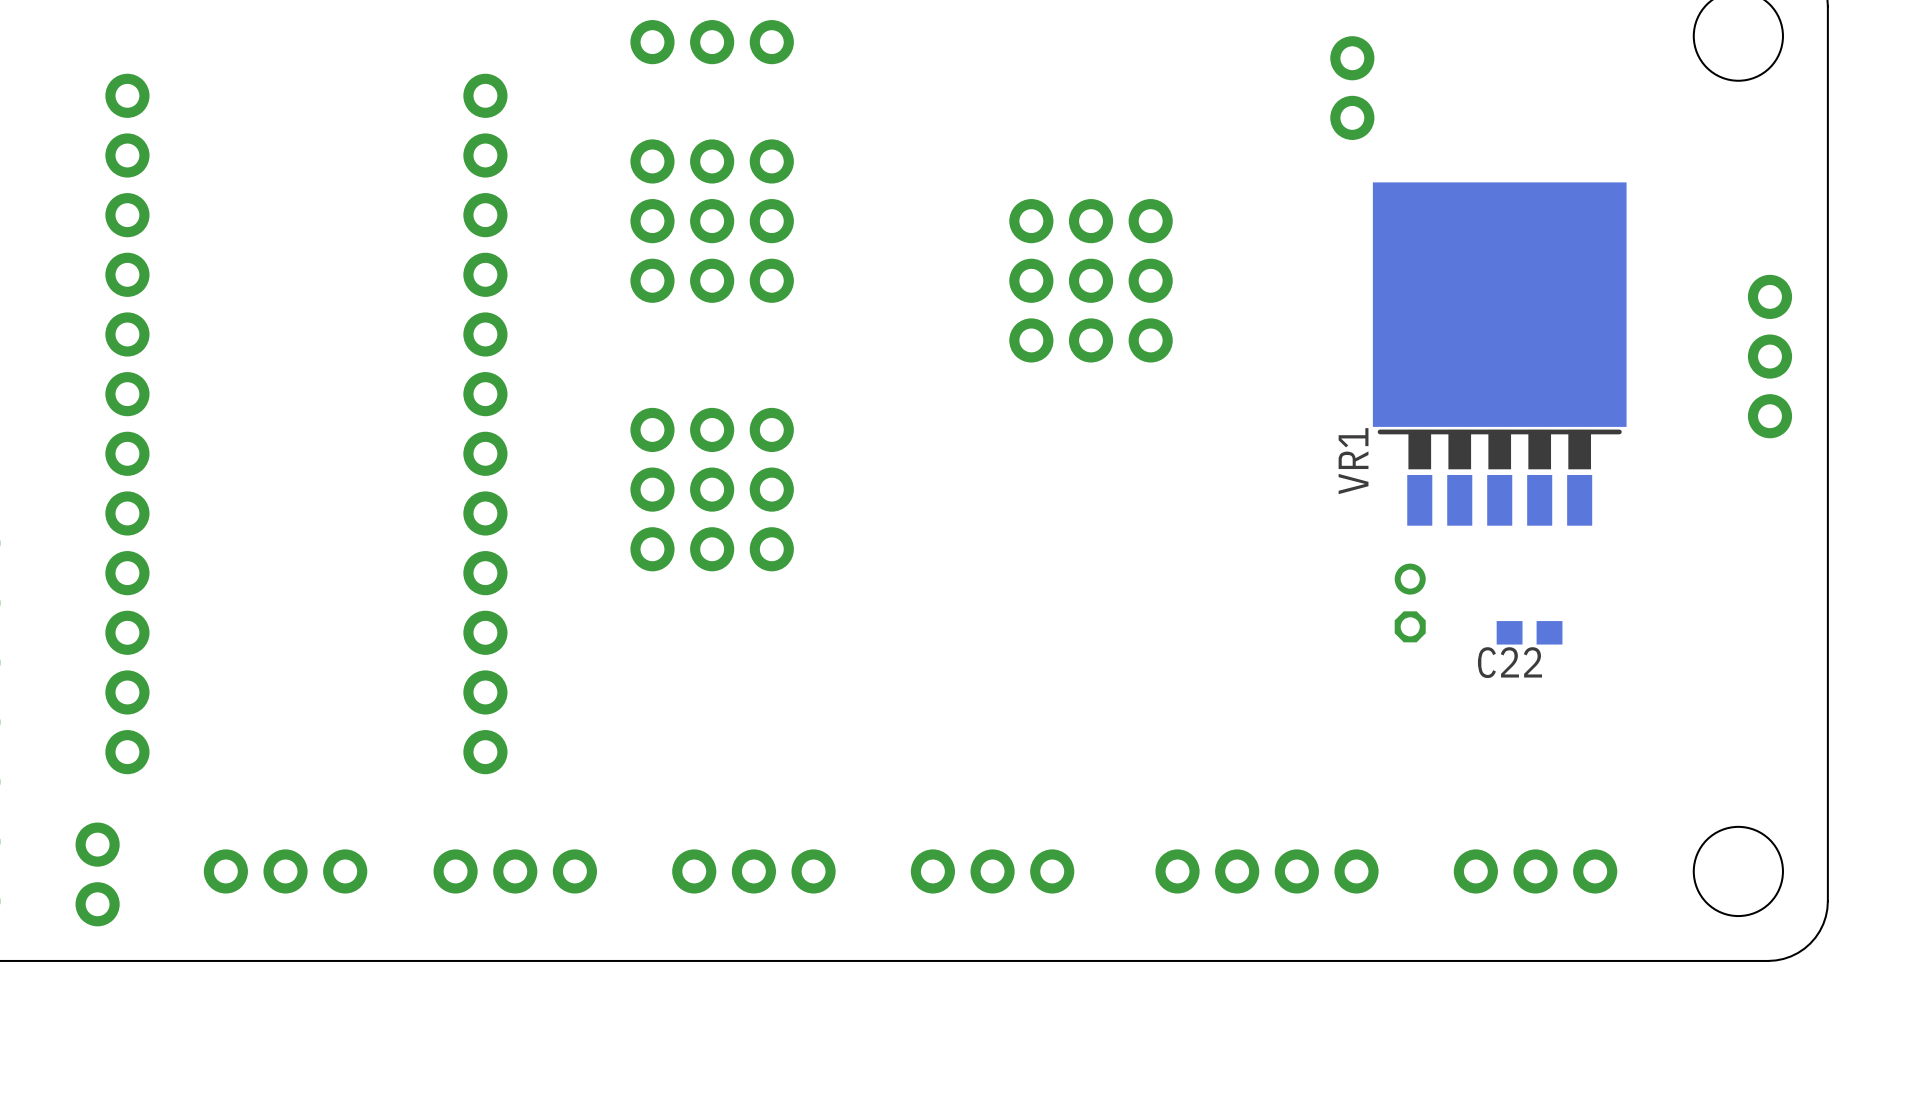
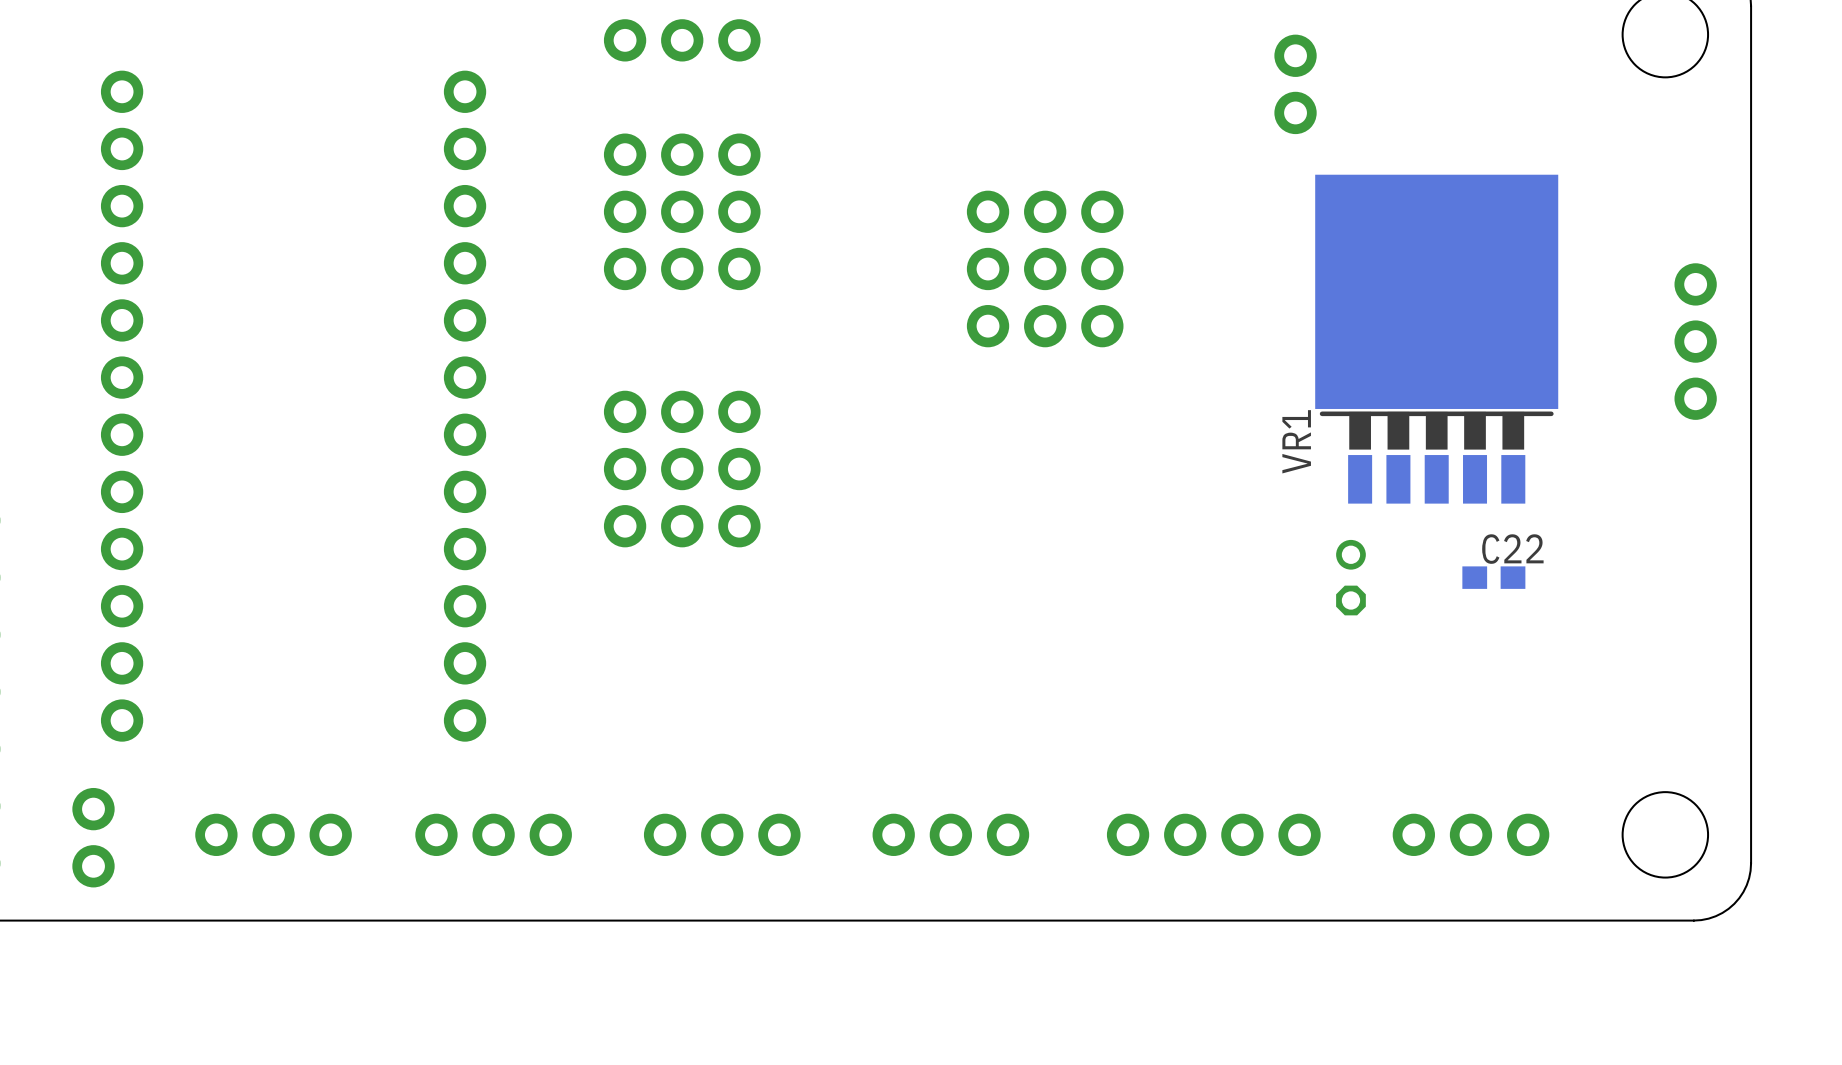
C22 position: (1529, 632) -> (1493, 577)
C22 name position: C22 (1509, 662) -> C22 (1512, 549)

